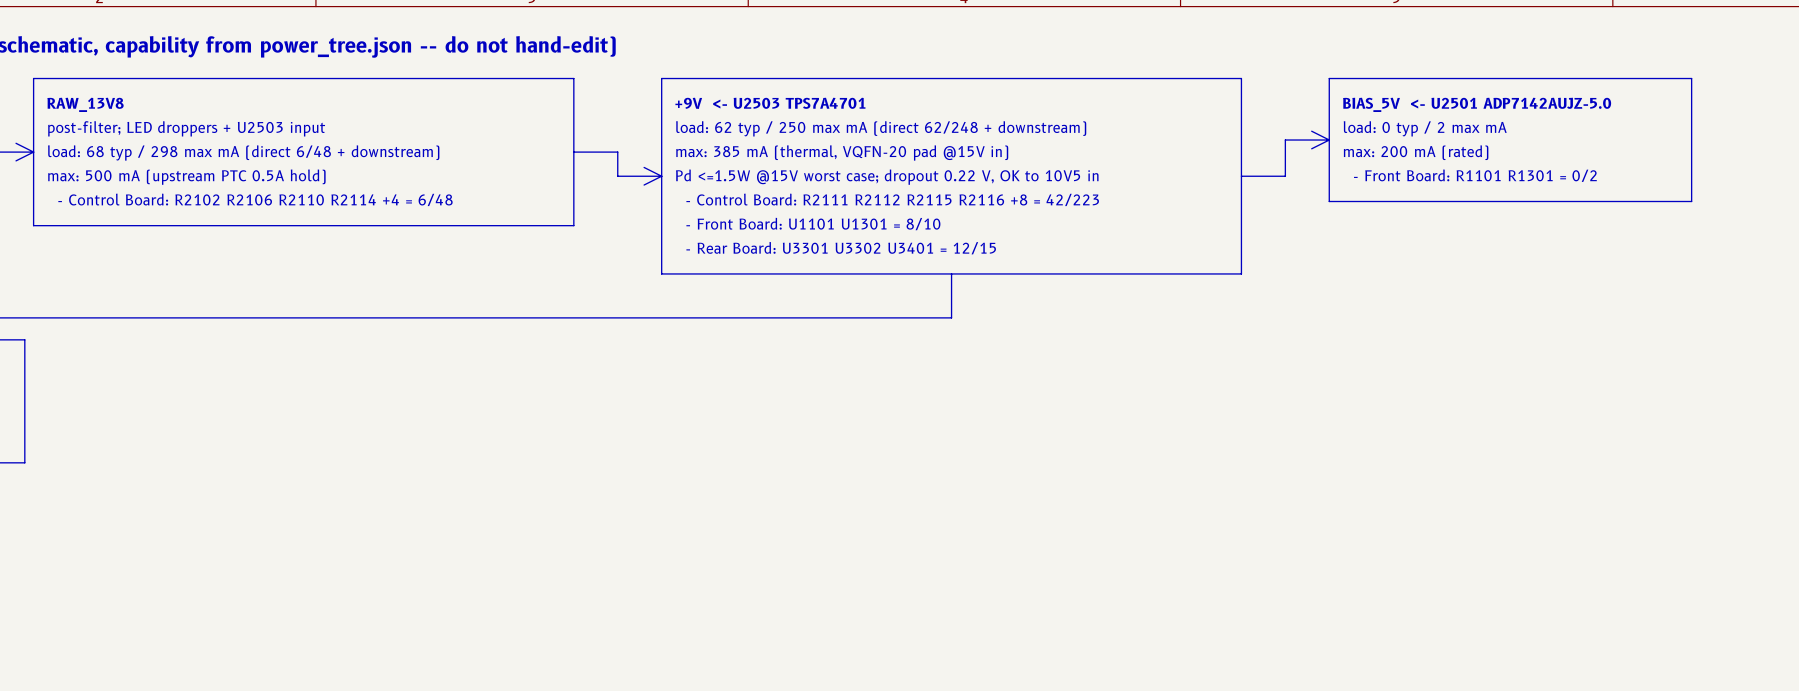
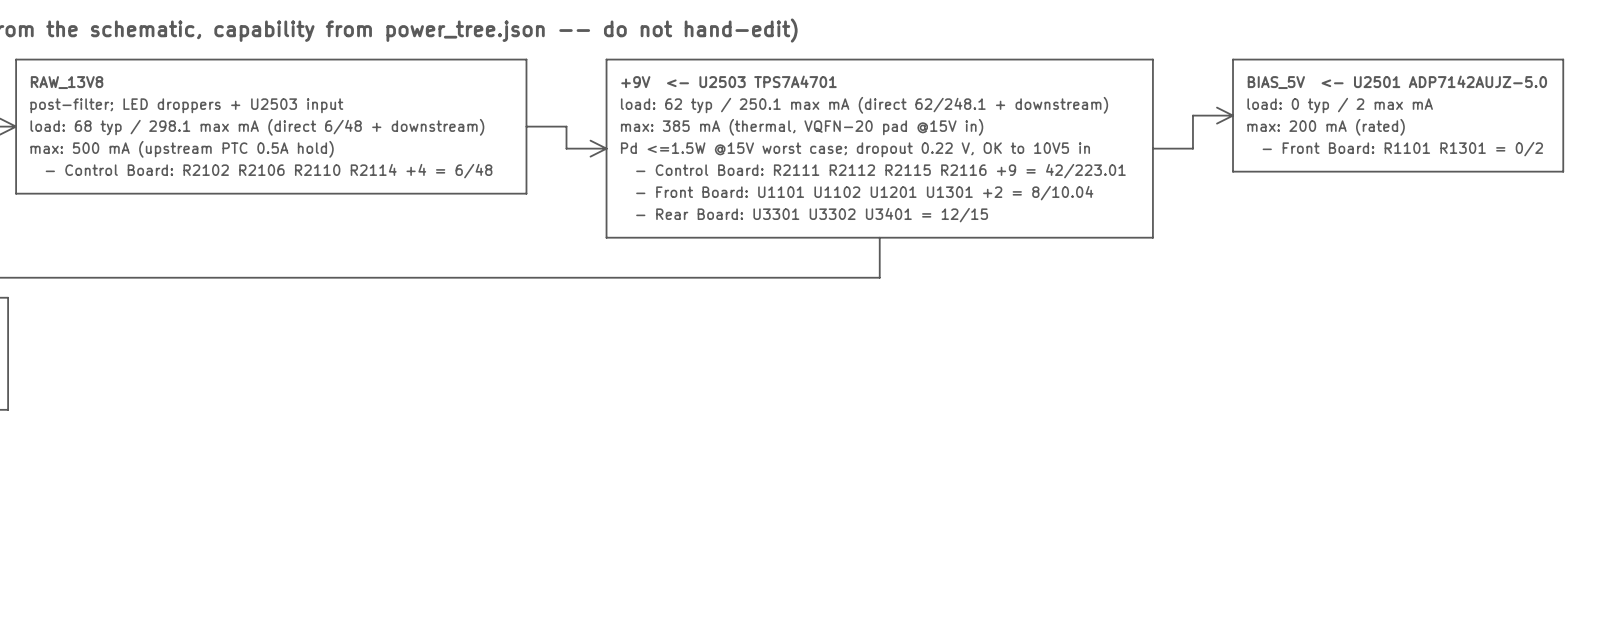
line: (573, 78) (573, 225) -> (508, 59) (526, 59) (526, 193) (508, 193)
line: (681, 78) (661, 78) (661, 273) (681, 273) -> (606, 59) (606, 237)
line: (1241, 78) (1241, 273) -> (1116, 59) (1152, 59) (1152, 237) (1116, 237)
line: (1368, 78) (1329, 78) (1329, 201) (1368, 201) -> (1233, 59) (1233, 171)
line: (1691, 78) (1691, 201) -> (1527, 59) (1563, 59) (1563, 171) (1527, 171)
text position: +9V <- U2503 TPS7A4701 (770, 103) -> +9V <- U2503 TPS7A4701 (728, 81)
text position: BIAS_5V <- U2501 ADP7142AUJZ-5.0 (1477, 104) -> BIAS_5V <- U2501 ADP7142AUJZ-5.0 (1397, 82)
text: load: 62 typ / 250 max mA (direct 62/248 + downstream) (881, 128) -> load: 62 typ / 250.1 max mA (direct 62/248.1 + downstream) (864, 105)
text position: load: 0 typ / 2 max mA (1425, 128) -> load: 0 typ / 2 max mA (1340, 105)
line: (1311, 131) (1329, 140) (1311, 148) -> none
line: none -> (1216, 107) (1233, 115)
line: (1324, 140) (1285, 140) (1285, 176) -> (1192, 115) (1192, 148) (1156, 148)
line: none -> (1233, 115) (1216, 123)
text: load: 68 typ / 298 max mA (direct 6/48 + downstream) (243, 152) -> load: 68 typ / 298.1 max mA (direct 6/48 + downstream) (257, 127)
line: (573, 152) (593, 152) -> (588, 148) (606, 148)
line: (617, 152) (617, 176) (637, 176) -> (548, 126) (566, 126) (566, 148)
text position: max: 385 mA (thermal, VQFN-20 pad @15V in) (842, 152) -> max: 385 mA (thermal, VQFN-20 pad @15V in) (802, 127)
text position: max: 200 mA (rated) (1416, 152) -> max: 200 mA (rated) (1326, 127)
line: (644, 167) (661, 176) (644, 185) -> none
line: none -> (590, 140) (606, 148)
text position: - Front Board: R1101 R1301 = 0/2 (1475, 175) -> - Front Board: R1101 R1301 = 0/2 (1402, 149)
line: none -> (606, 148) (590, 156)
line: (1241, 176) (1280, 176) -> (1196, 115) (1233, 115)
text position: Pd <=1.5W @15V worst case; dropout 0.22 V, OK to 10V5 in (887, 177) -> Pd <=1.5W @15V worst case; dropout 0.22 V, OK to 10V5 in (855, 149)
text: - Control Board: R2111 R2112 R2115 R2116 +8 = 42/223 (892, 199) -> - Control Board: R2111 R2112 R2115 R2116 +9 = 42/223.01 (880, 171)
text: - Front Board: U1101 U1301 = 8/10 (813, 224) -> - Front Board: U1101 U1102 U1201 U1301 +2 = 8/10.04 (864, 193)
text position: - Rear Board: U3301 U3302 U3401 = 12/15 (841, 248) -> - Rear Board: U3301 U3302 U3401 = 12/15 (812, 215)
line: (951, 273) (951, 317) -> (879, 237) (879, 277) (852, 277)

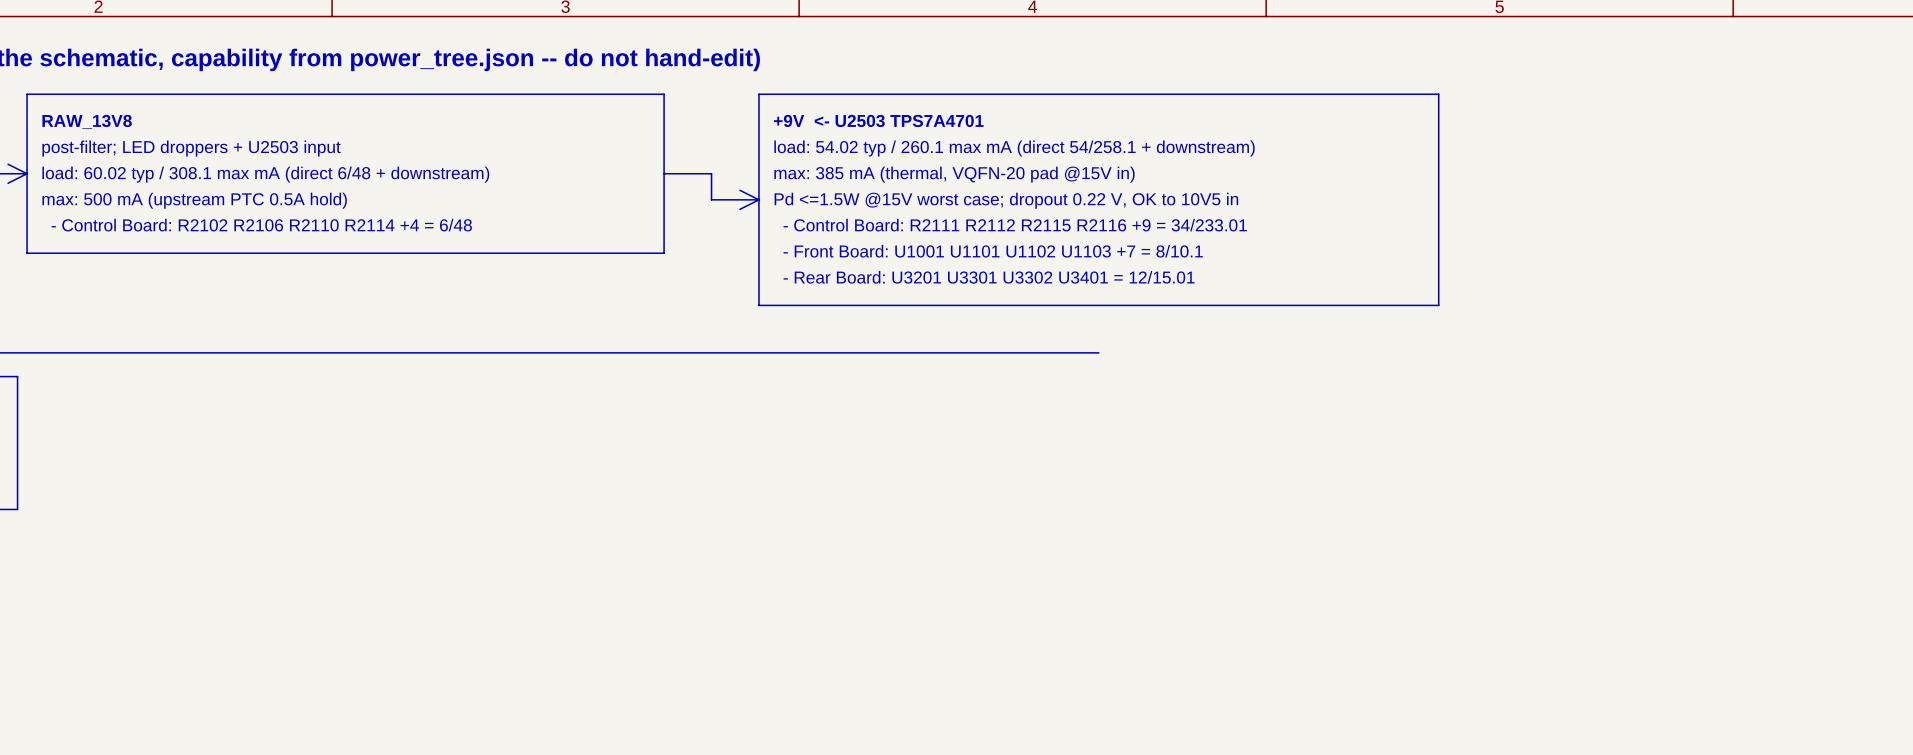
line: (526, 59) (526, 193) -> (632, 94) (664, 94) (664, 253) (632, 253)
line: (633, 59) (606, 59) (606, 237) (633, 237) -> (758, 94) (758, 305)
line: (1152, 59) (1152, 237) -> (1374, 94) (1438, 94) (1438, 305) (1374, 305)
line: (1233, 59) (1563, 59) (1563, 171) (1233, 171) (1233, 59) -> none
text position: +9V <- U2503 TPS7A4701 (728, 81) -> +9V <- U2503 TPS7A4701 (878, 120)
text: BIAS_5V <- U2501 ADP7142AUJZ-5.0 (1397, 82) -> none
text: load: 62 typ / 250.1 max mA (direct 62/248.1 + downstream) (864, 105) -> load: 54.02 typ / 260.1 max mA (direct 54/258.1 + downstream) (1014, 148)
text: load: 0 typ / 2 max mA (1340, 105) -> none
line: (1216, 107) (1233, 115) -> none
line: (1233, 115) (1192, 115) (1192, 148) (1152, 148) -> none
line: (1233, 115) (1216, 123) -> none
line: (526, 126) (553, 126) -> (726, 199) (758, 199)
line: (566, 126) (566, 148) (593, 148) -> (679, 173) (711, 173) (711, 199)
text: load: 68 typ / 298.1 max mA (direct 6/48 + downstream) (257, 127) -> load: 60.02 typ / 308.1 max mA (direct 6/48 + downstream) (265, 174)
text position: max: 385 mA (thermal, VQFN-20 pad @15V in) (802, 127) -> max: 385 mA (thermal, VQFN-20 pad @15V in) (954, 174)
text: max: 200 mA (rated) (1326, 127) -> none
line: (590, 140) (606, 148) (590, 156) -> none
line: none -> (739, 190) (758, 199)
line: none -> (758, 199) (739, 209)
text position: Pd <=1.5W @15V worst case; dropout 0.22 V, OK to 10V5 in (855, 149) -> Pd <=1.5W @15V worst case; dropout 0.22 V, OK to 10V5 in (1006, 200)
text: - Front Board: R1101 R1301 = 0/2 (1402, 149) -> none
text: - Control Board: R2111 R2112 R2115 R2116 +9 = 42/223.01 (880, 171) -> - Control Board: R2111 R2112 R2115 R2116 +9 = 34/233.01 (1015, 225)
text: - Front Board: U1101 U1102 U1201 U1301 +2 = 8/10.04 (864, 193) -> - Front Board: U1001 U1101 U1102 U1103 +7 = 8/10.1 (993, 251)
text: - Rear Board: U3301 U3302 U3401 = 12/15 (812, 215) -> - Rear Board: U3201 U3301 U3302 U3401 = 12/15.01 (989, 277)
line: (879, 237) (879, 277) -> (1098, 352) (1050, 352)

